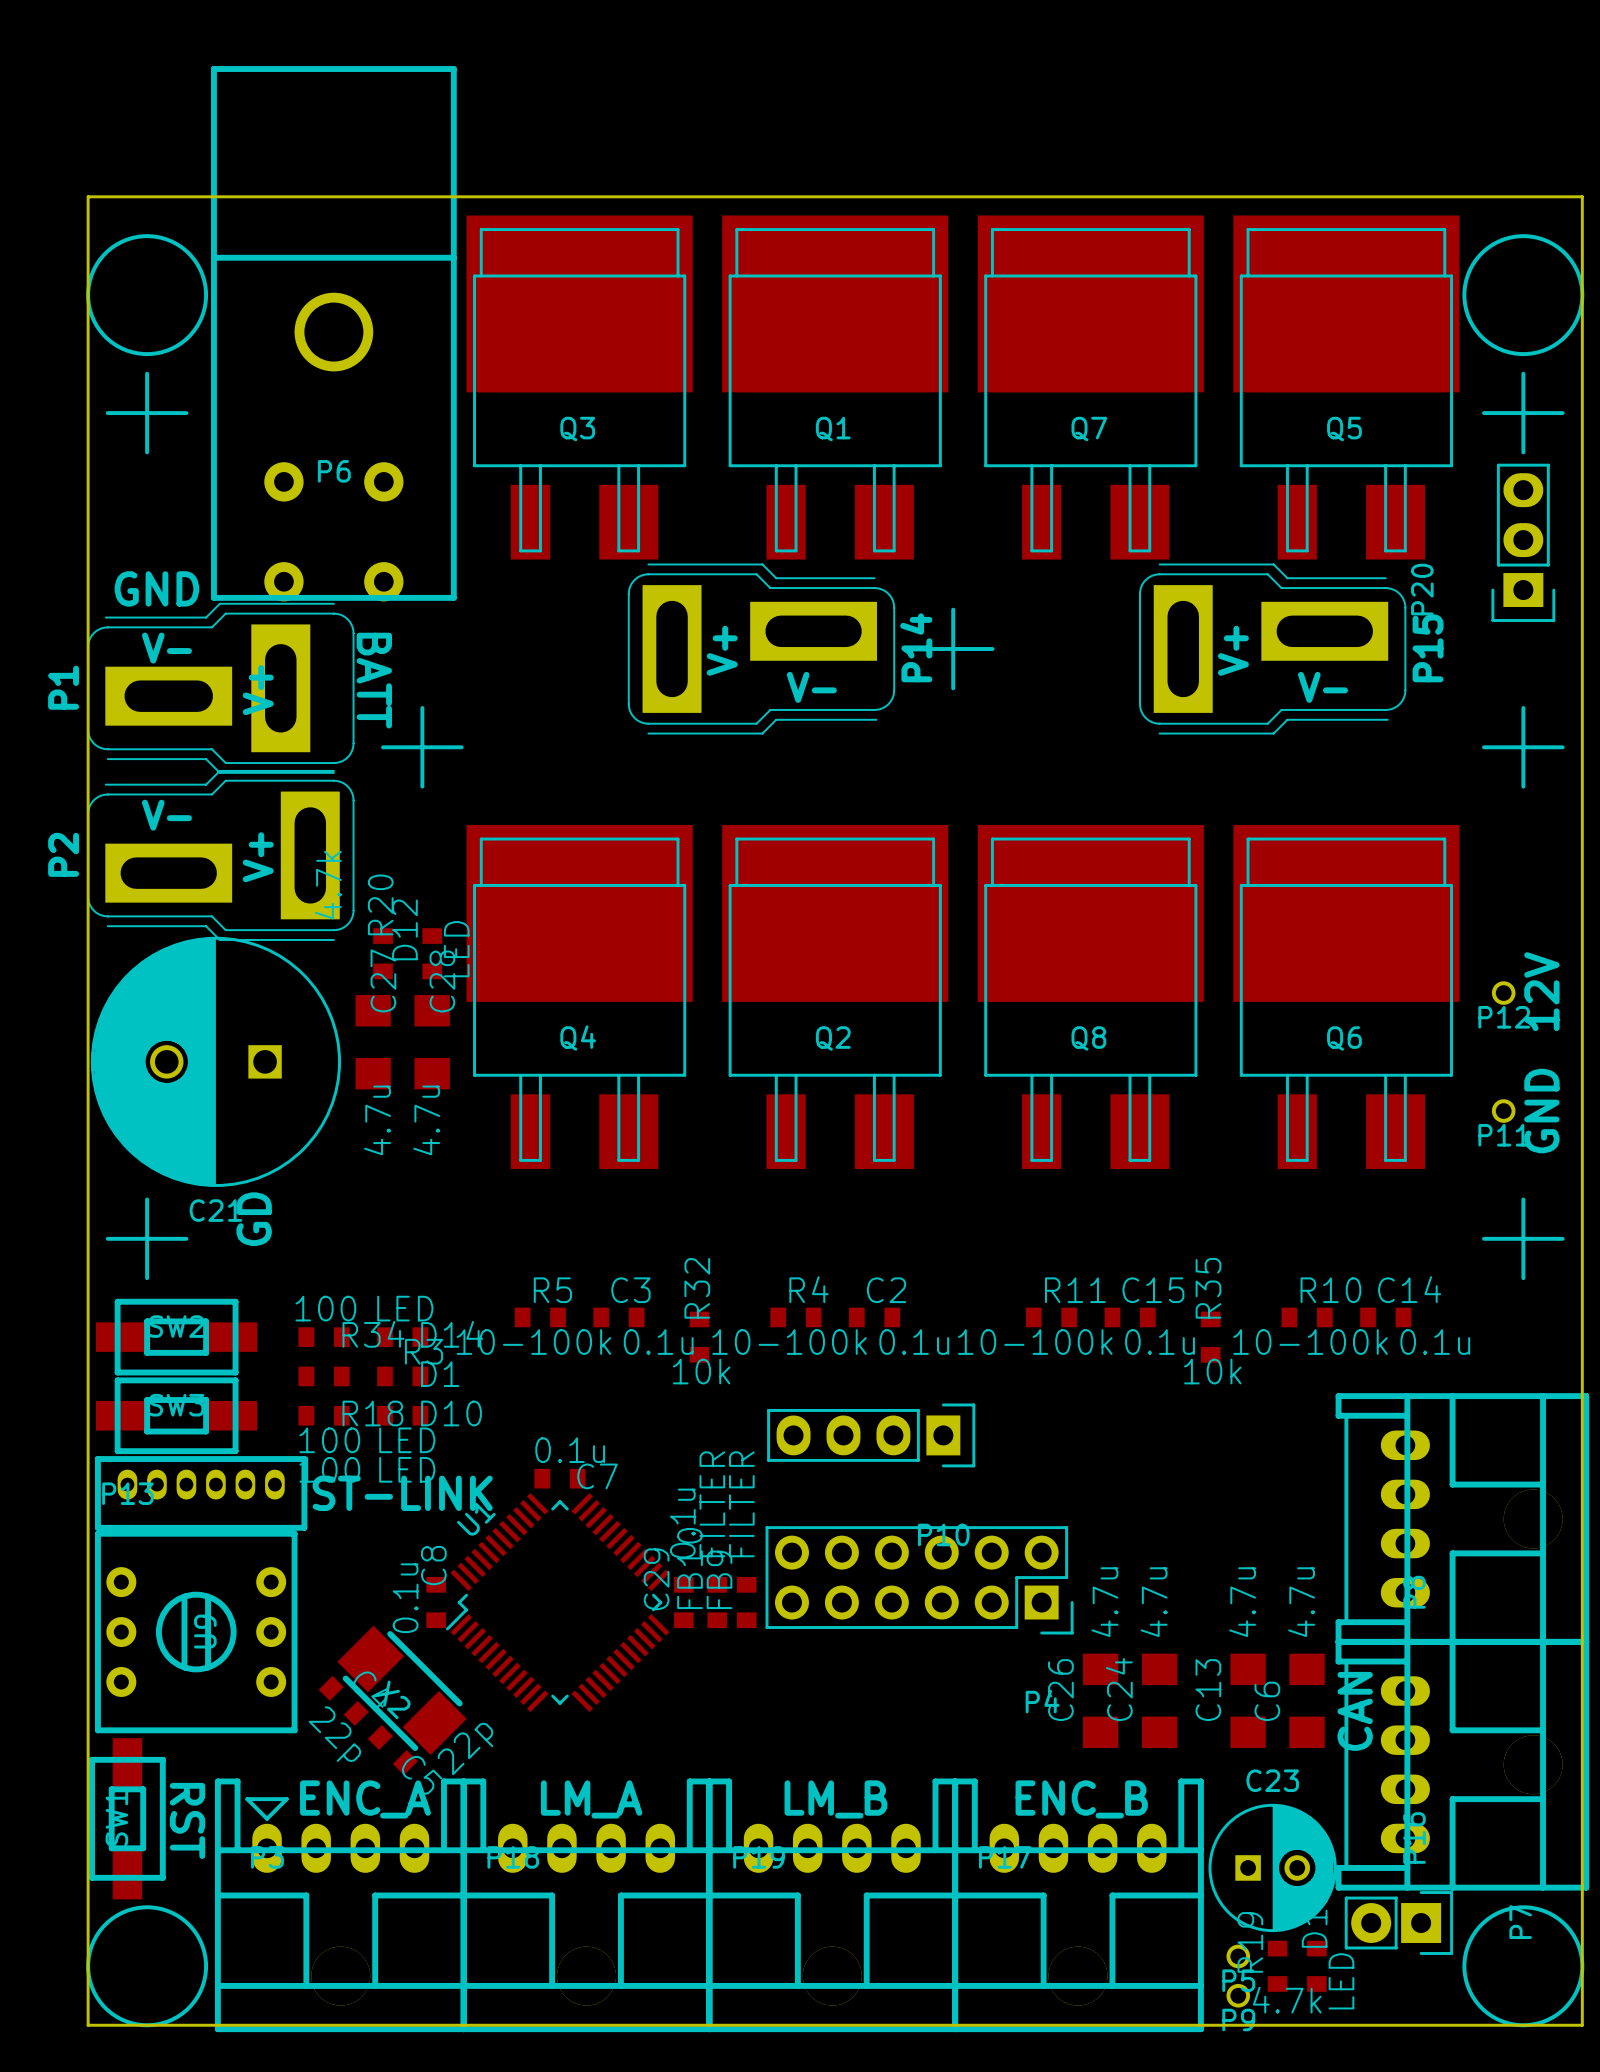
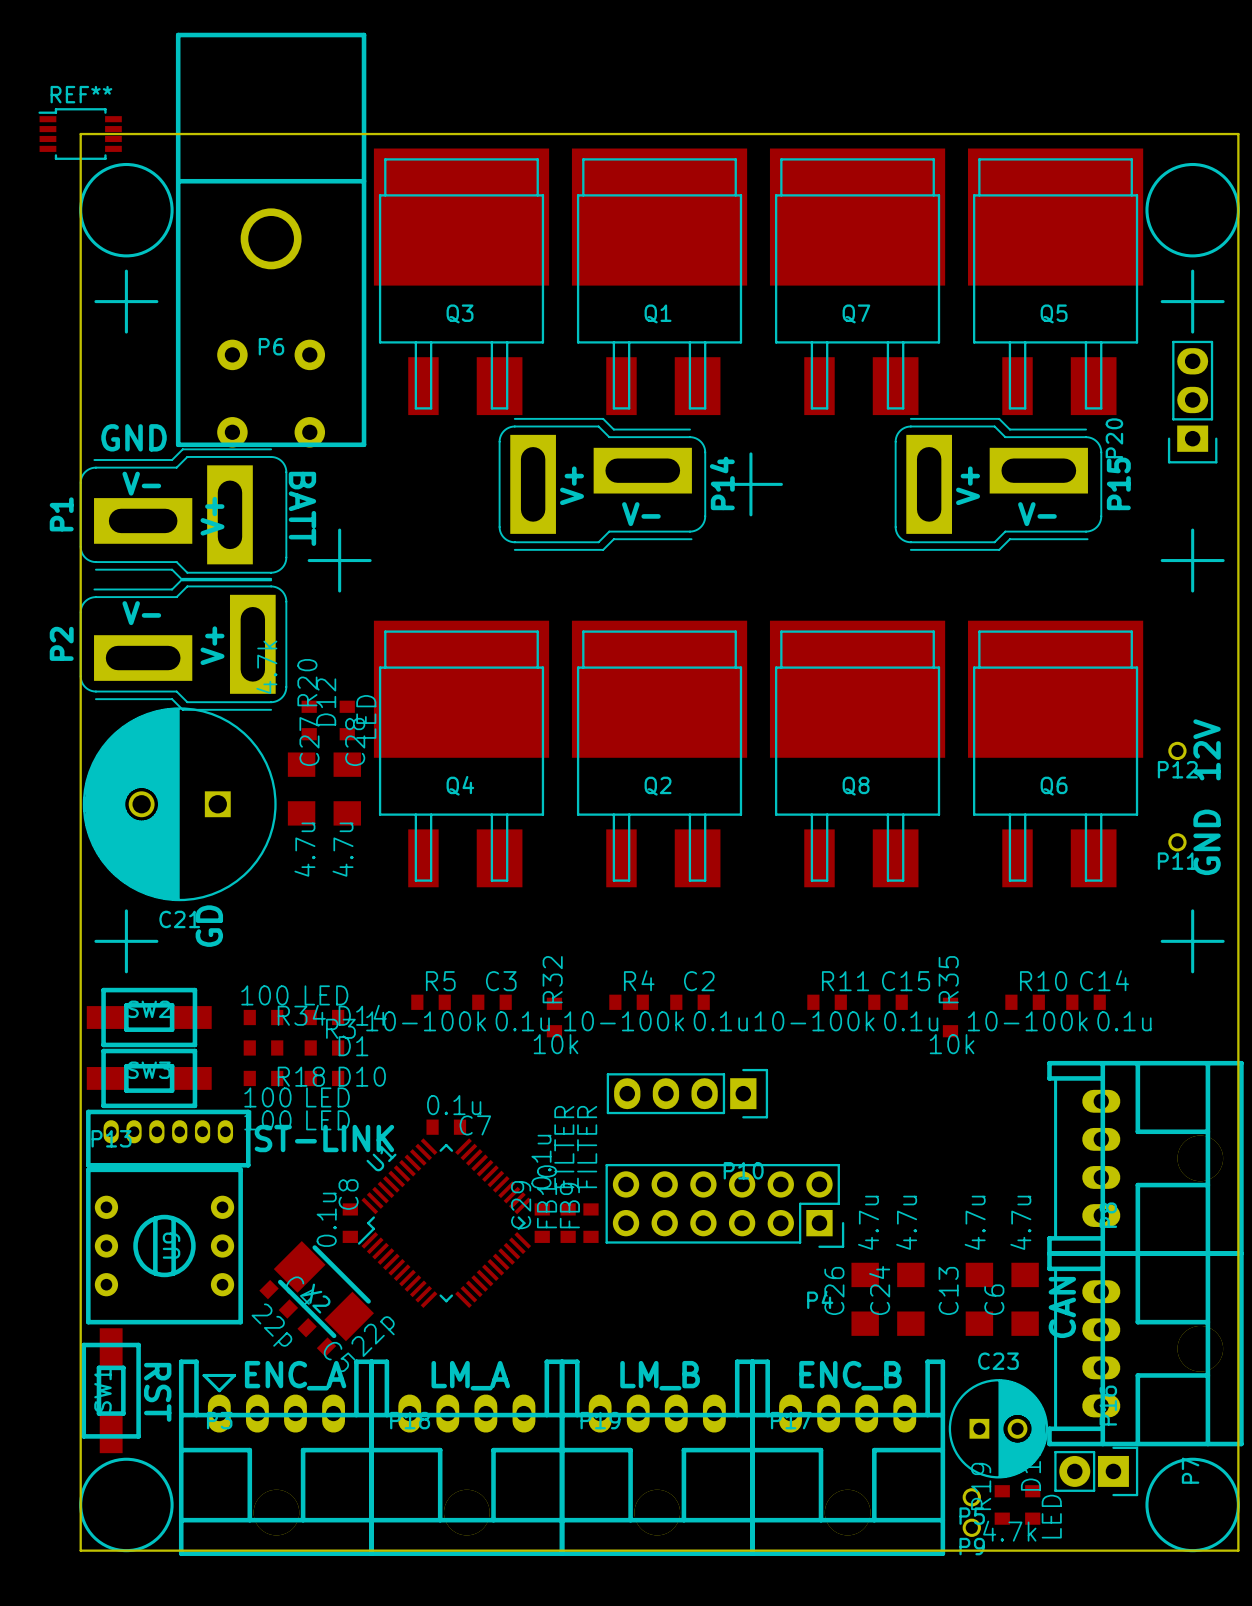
REF**: none -> (80, 134)

